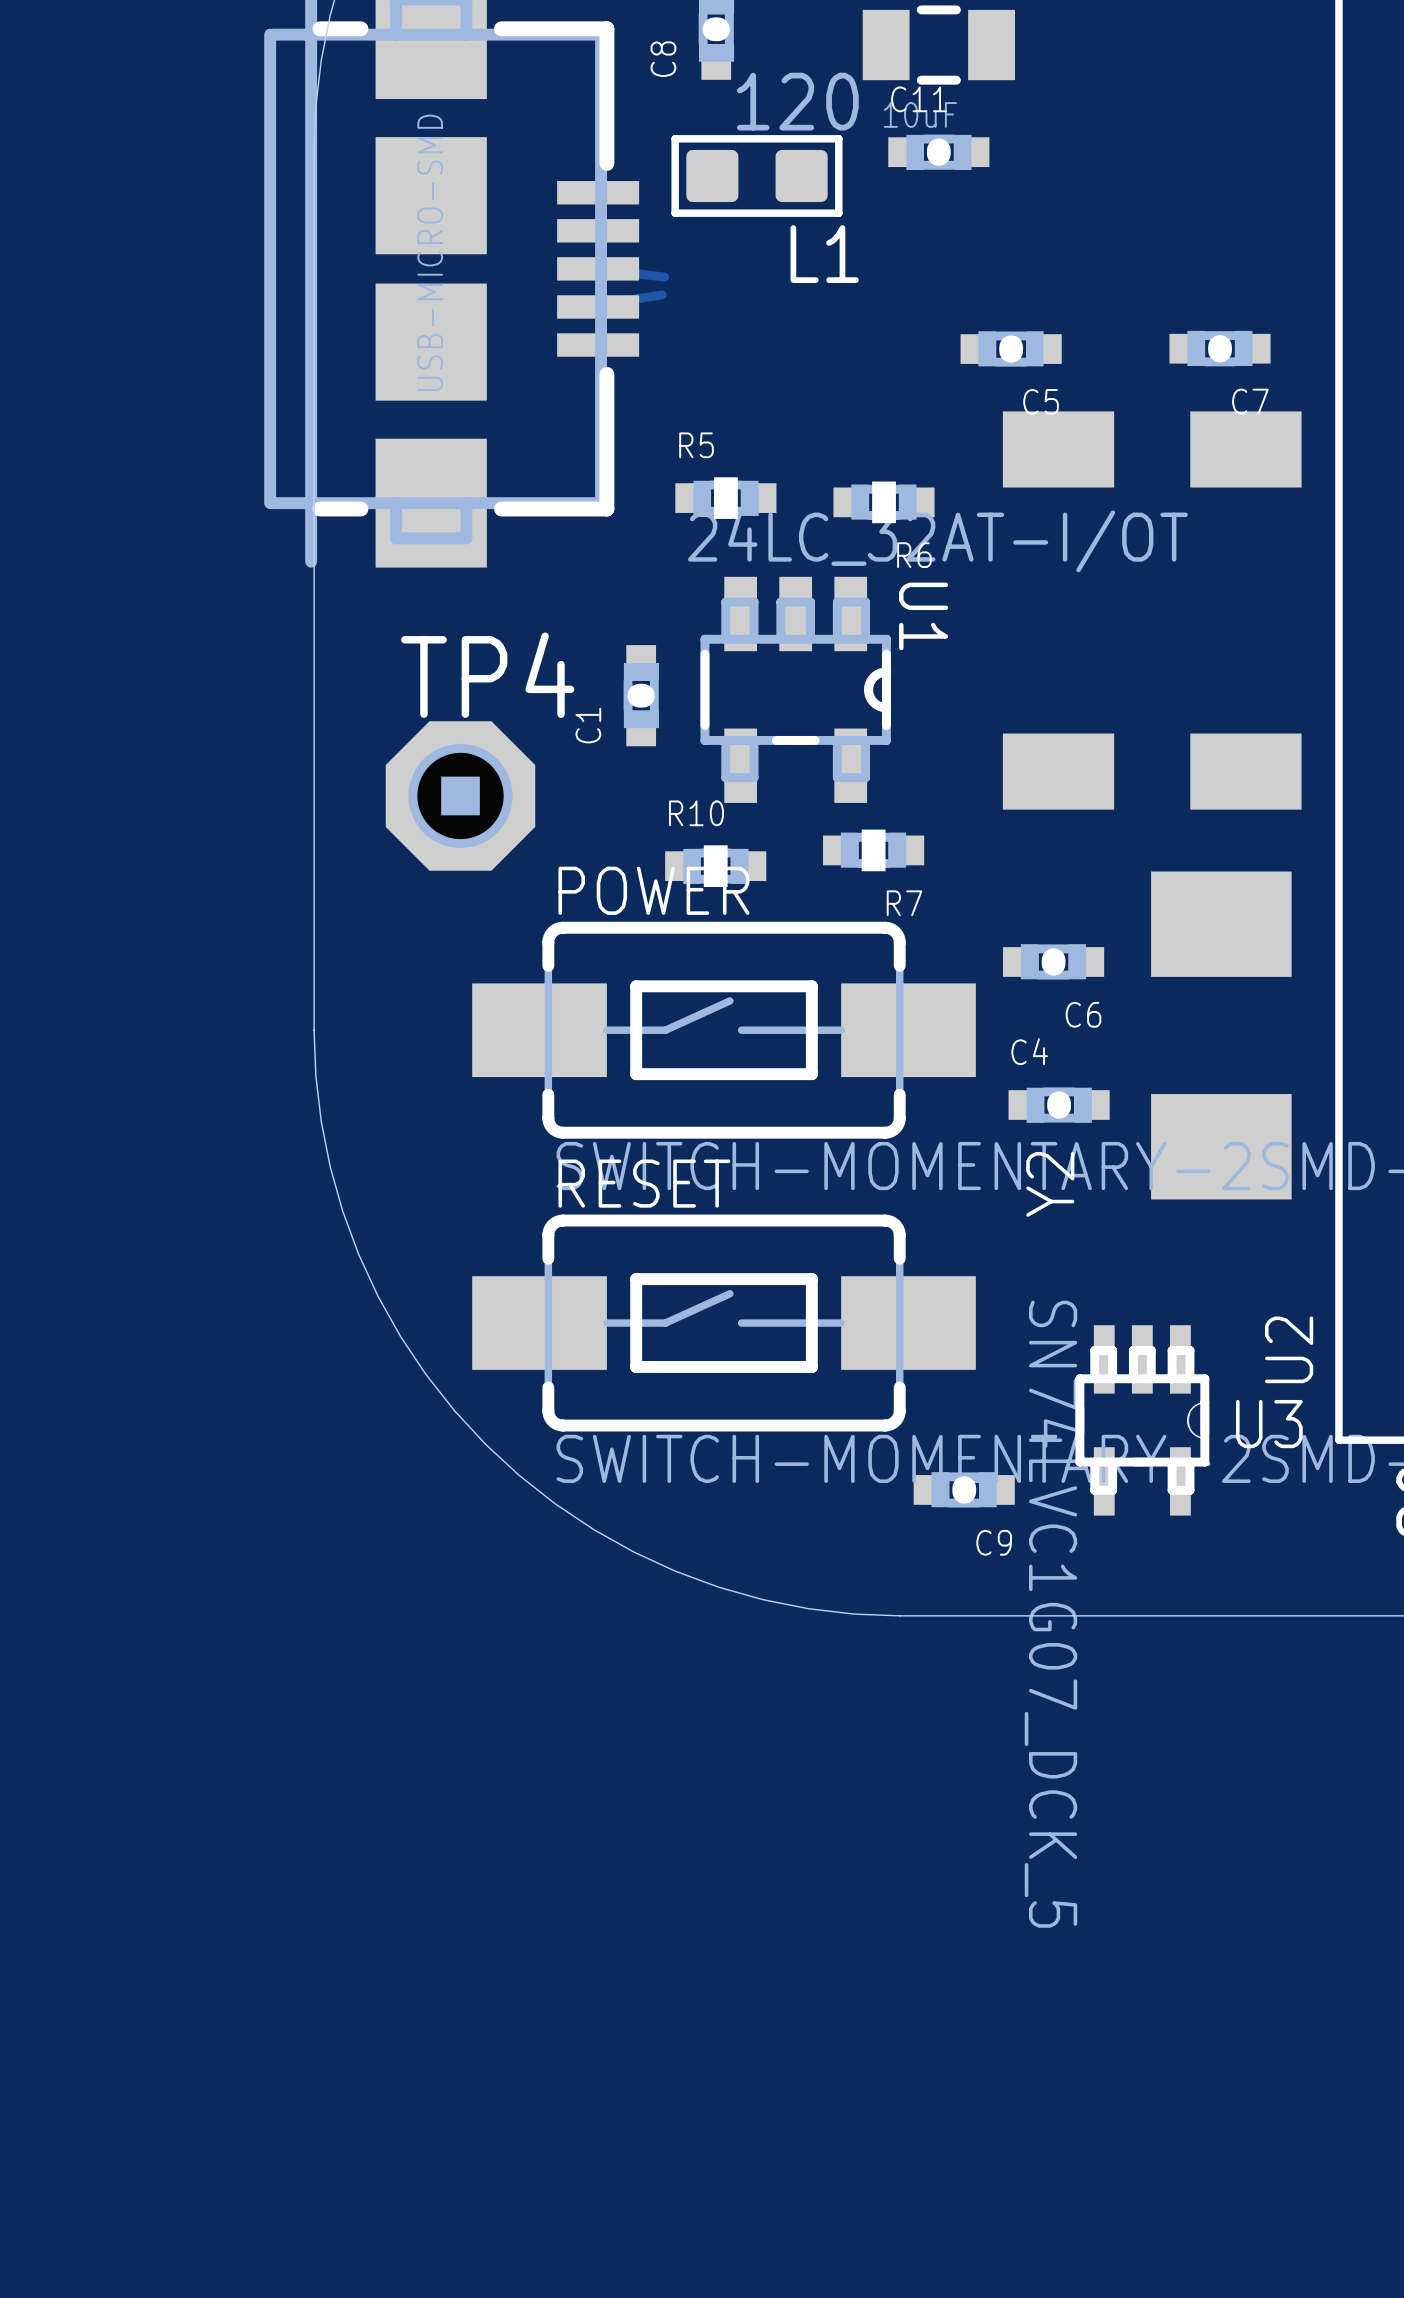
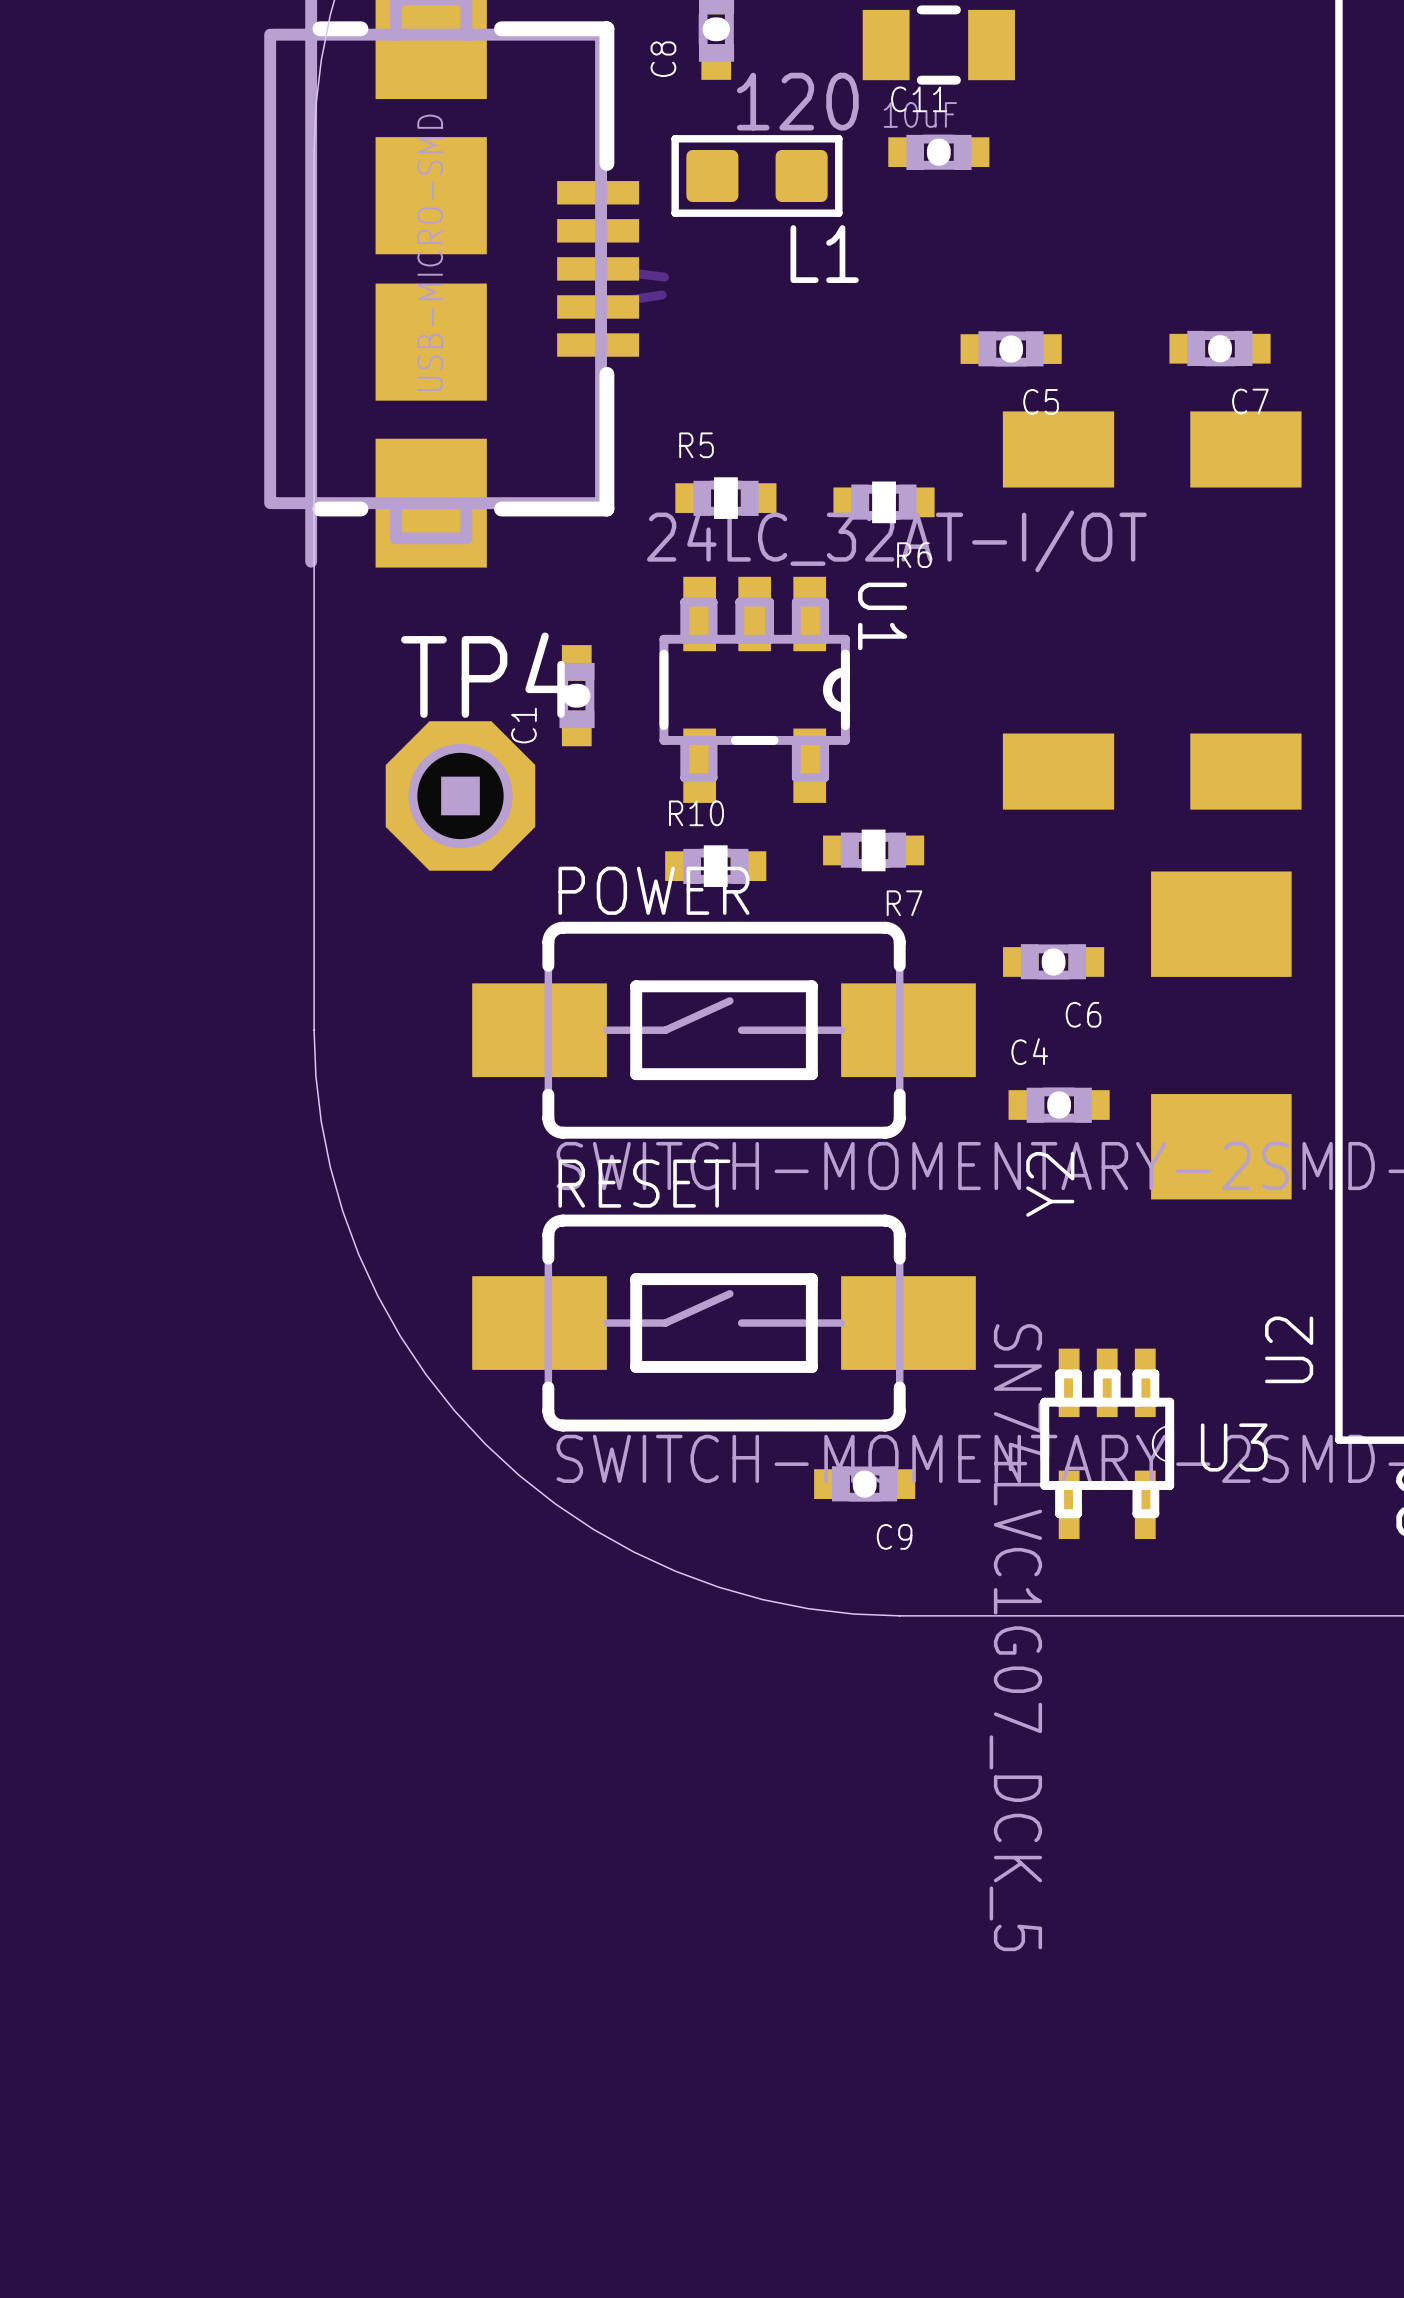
U1 position: (795, 689) -> (754, 689)
C1 position: (641, 695) -> (576, 695)
U3 position: (1142, 1420) -> (1107, 1443)
C9 position: (964, 1489) -> (864, 1483)

